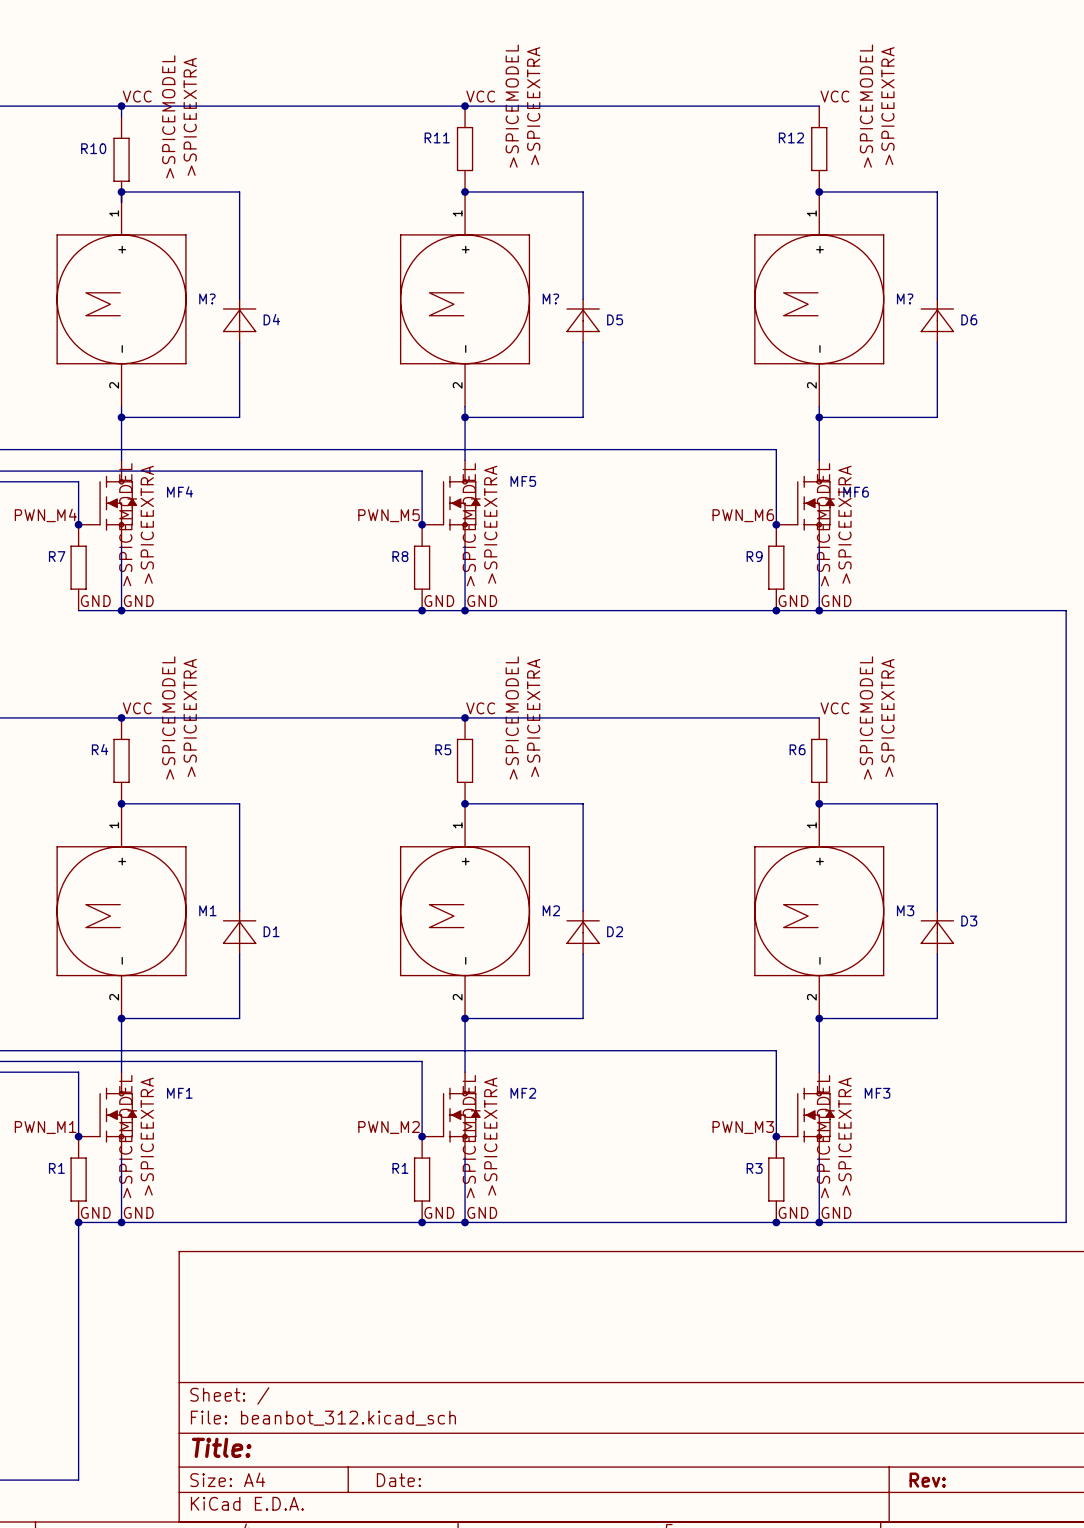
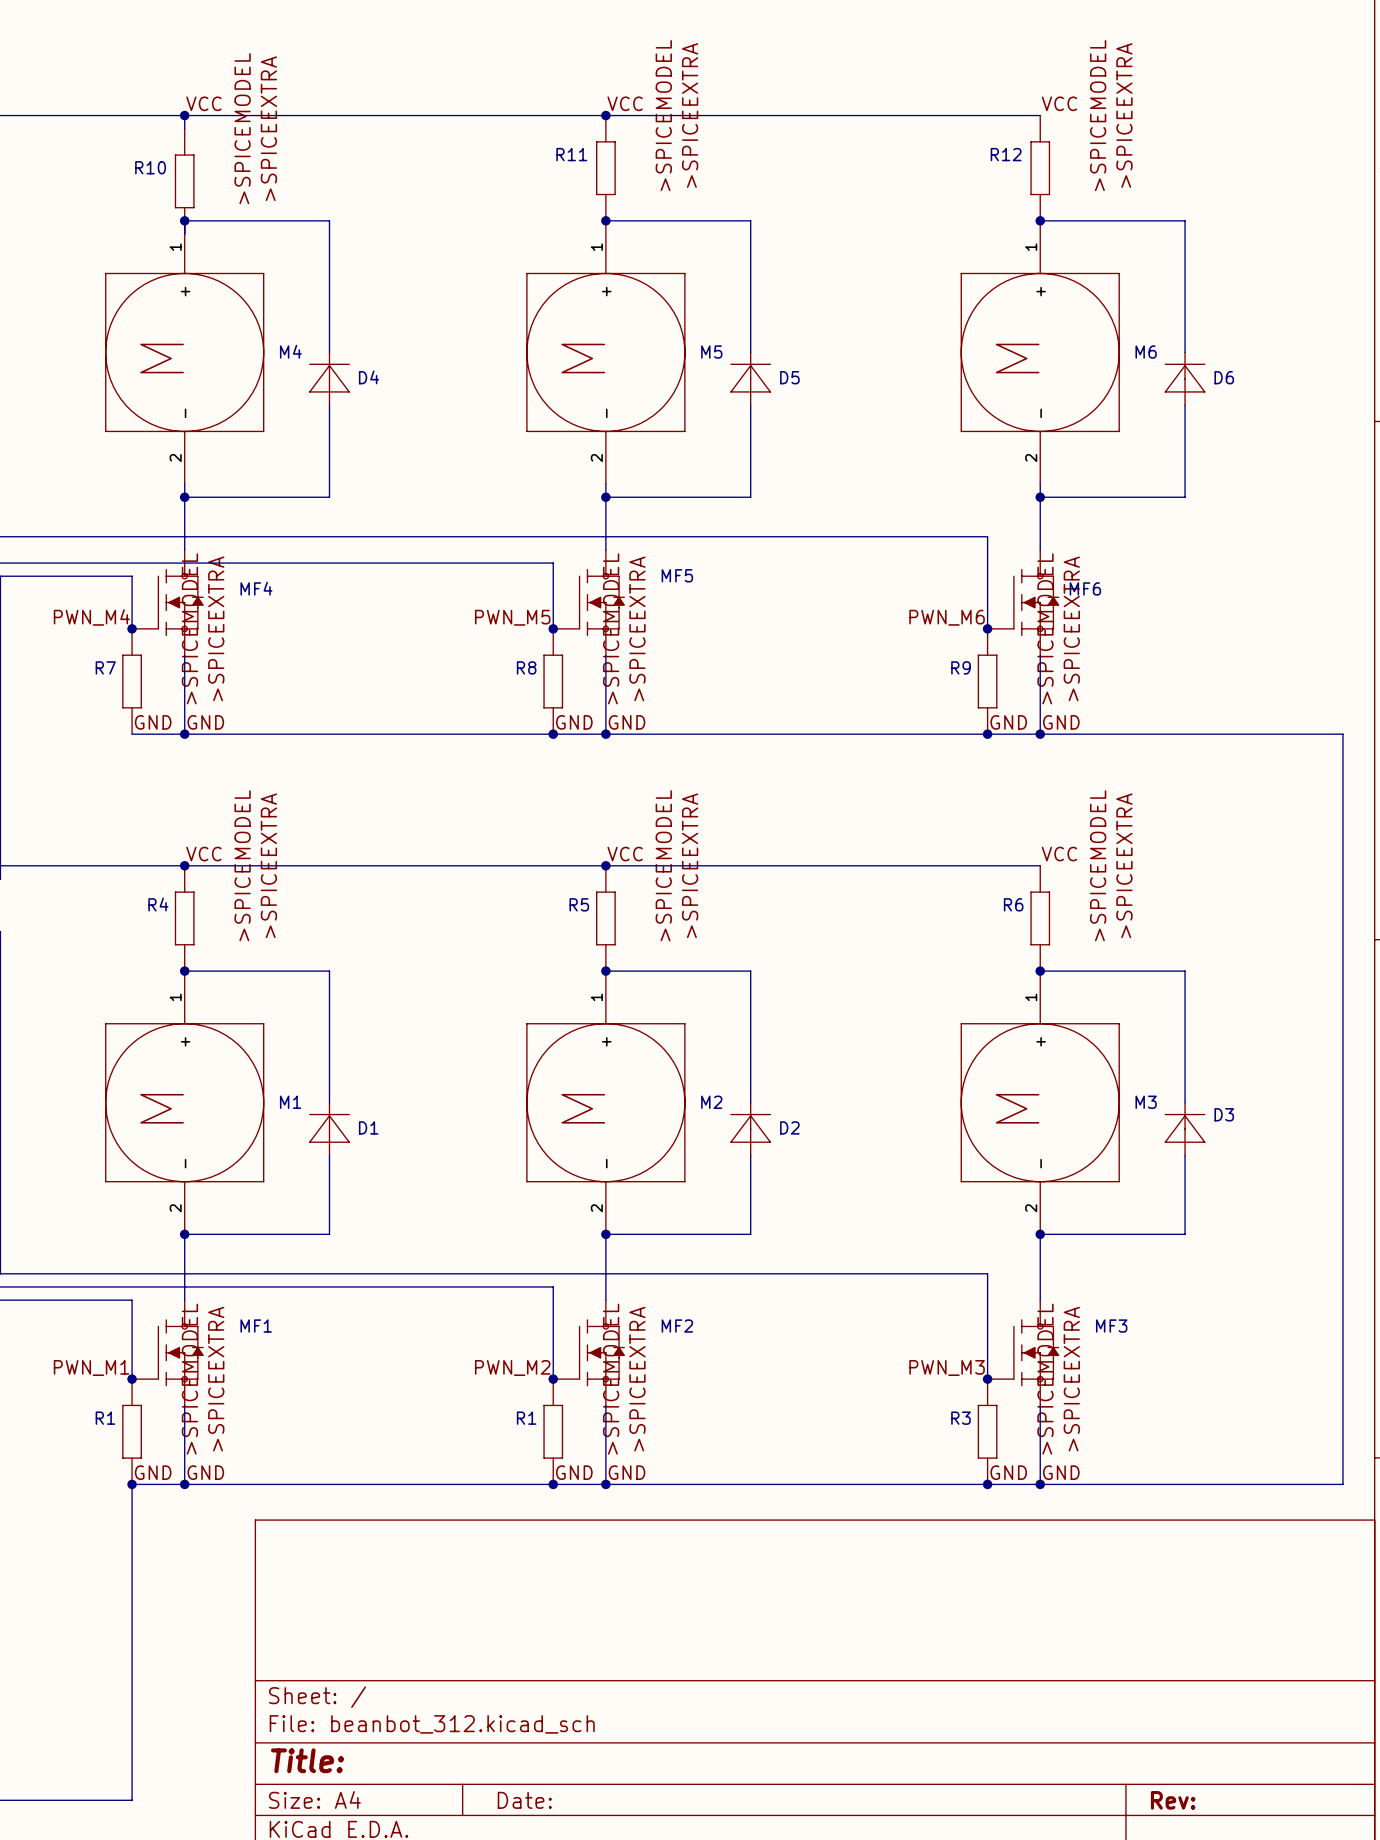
M? name: M? (207, 298) -> M4 (290, 351)
M? name: M? (550, 298) -> M5 (711, 352)
M? name: M? (905, 298) -> M6 (1146, 352)

